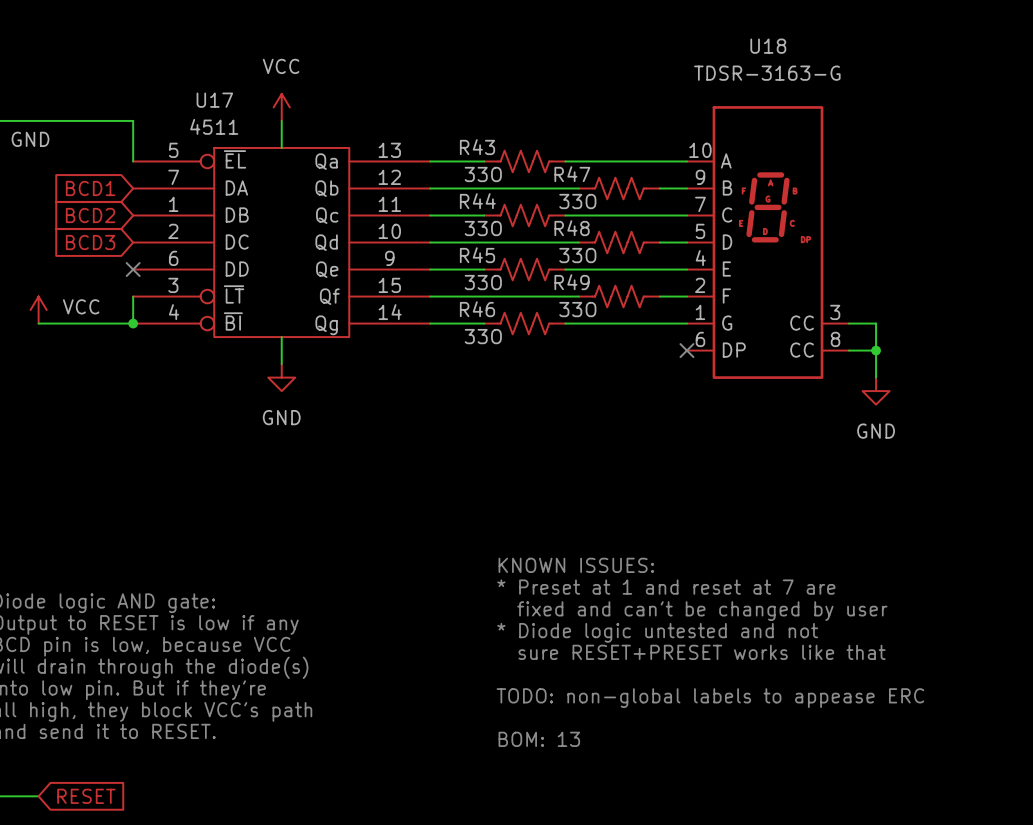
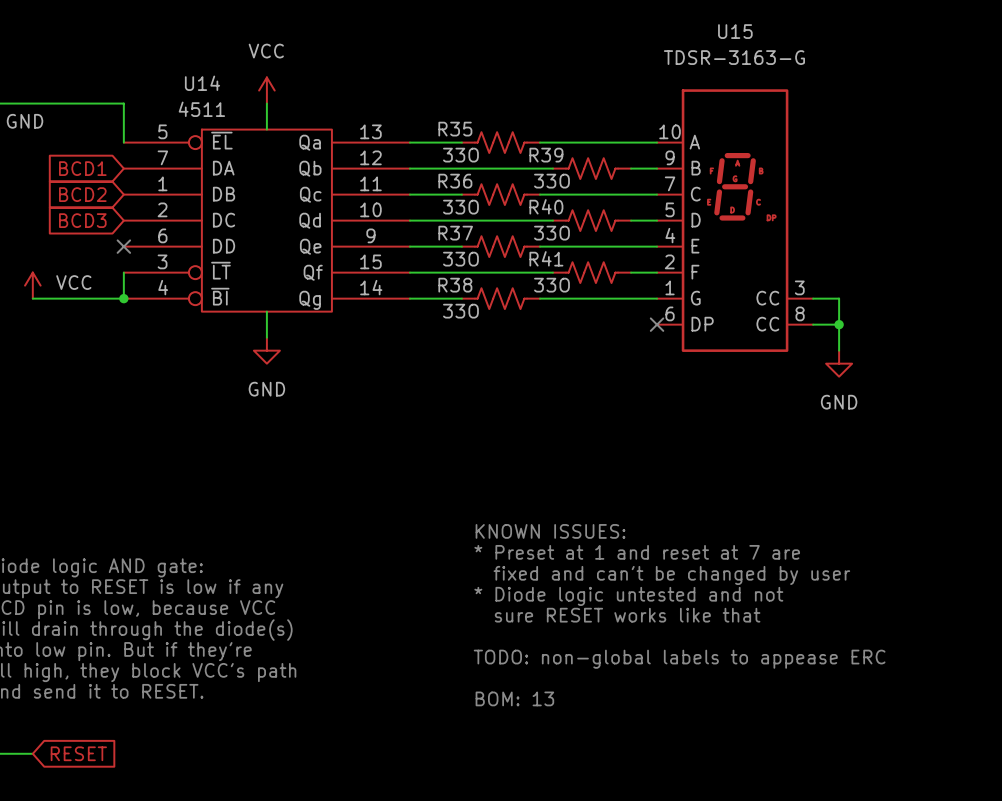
U18 name: U18 (768, 46) -> U15 (735, 31)
U17 name: U17 (214, 100) -> U14 (202, 83)
R43 name: R43 (477, 147) -> R35 (455, 129)
R47 name: R47 (572, 174) -> R39 (546, 155)
R44 name: R44 (477, 201) -> R36 (455, 181)
R48 name: R48 (572, 228) -> R40 (546, 206)
R45 name: R45 (477, 255) -> R37 (455, 233)
R49 name: R49 (572, 282) -> R41 (546, 258)
R46 name: R46 (477, 309) -> R38 (455, 285)
text: sure RESET+PRESET works like that (702, 652) -> sure RESET works like that (627, 615)

